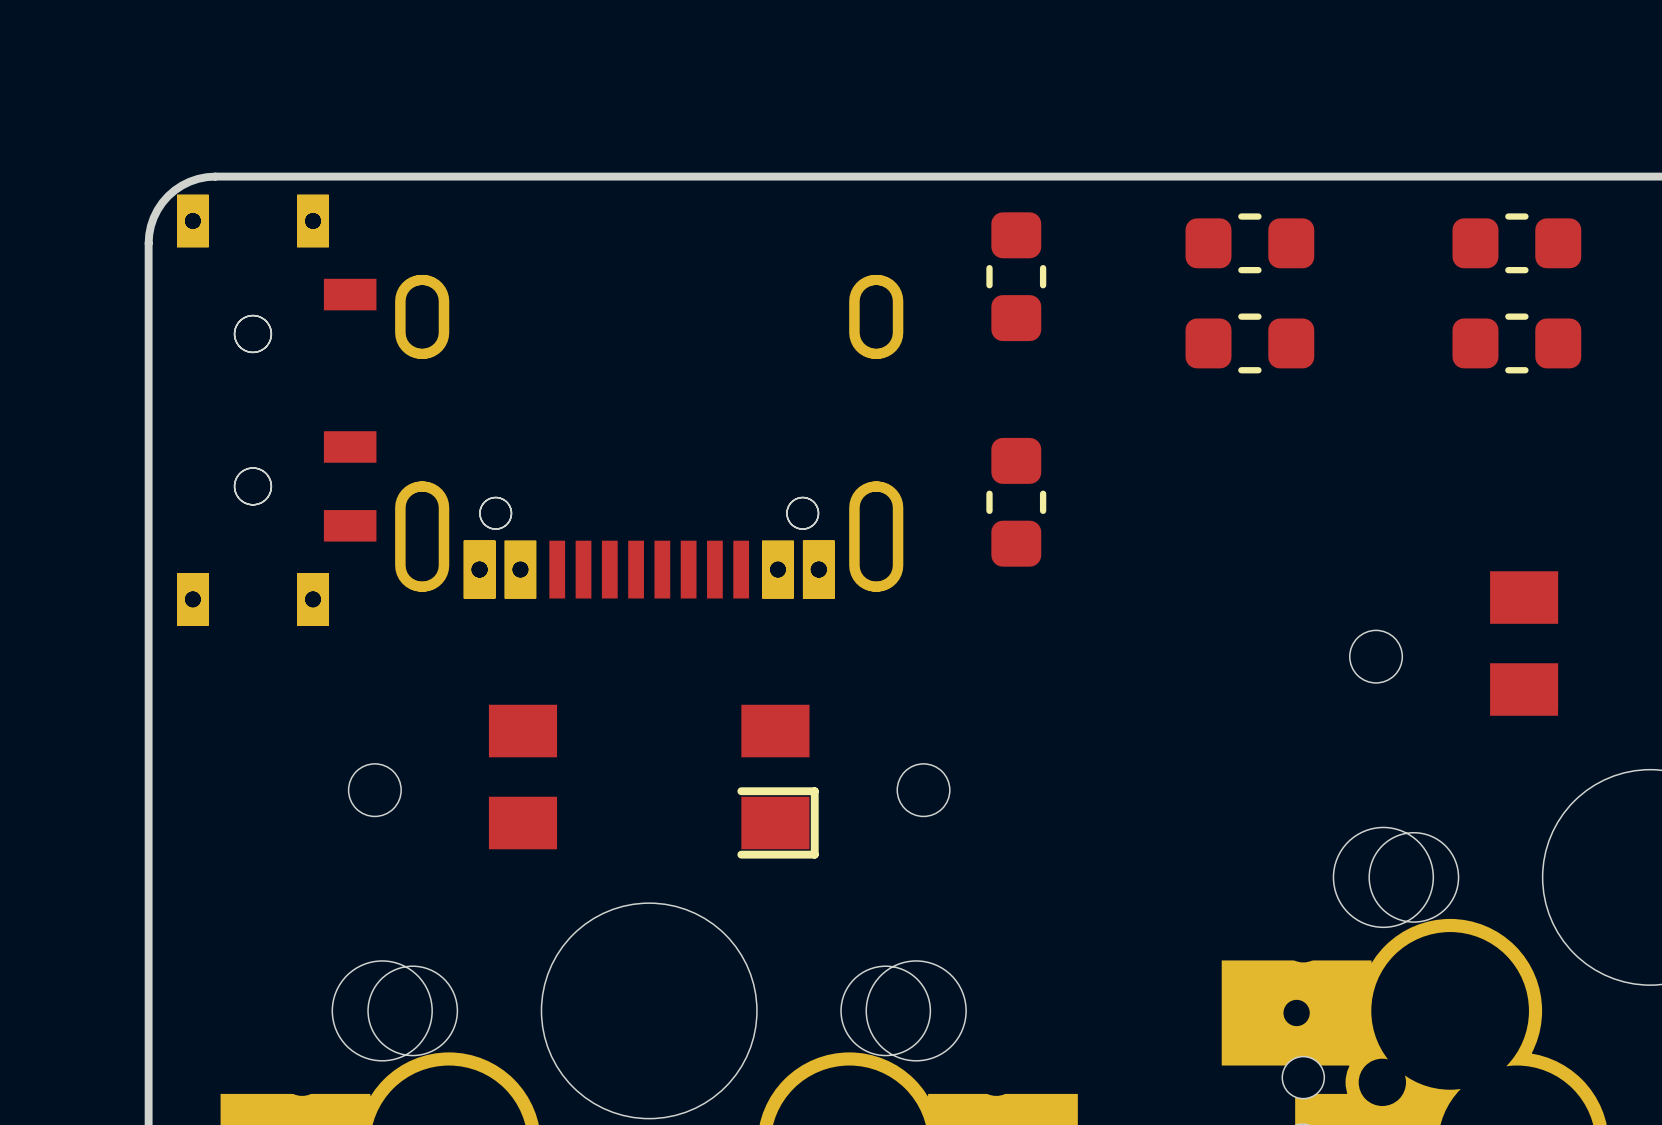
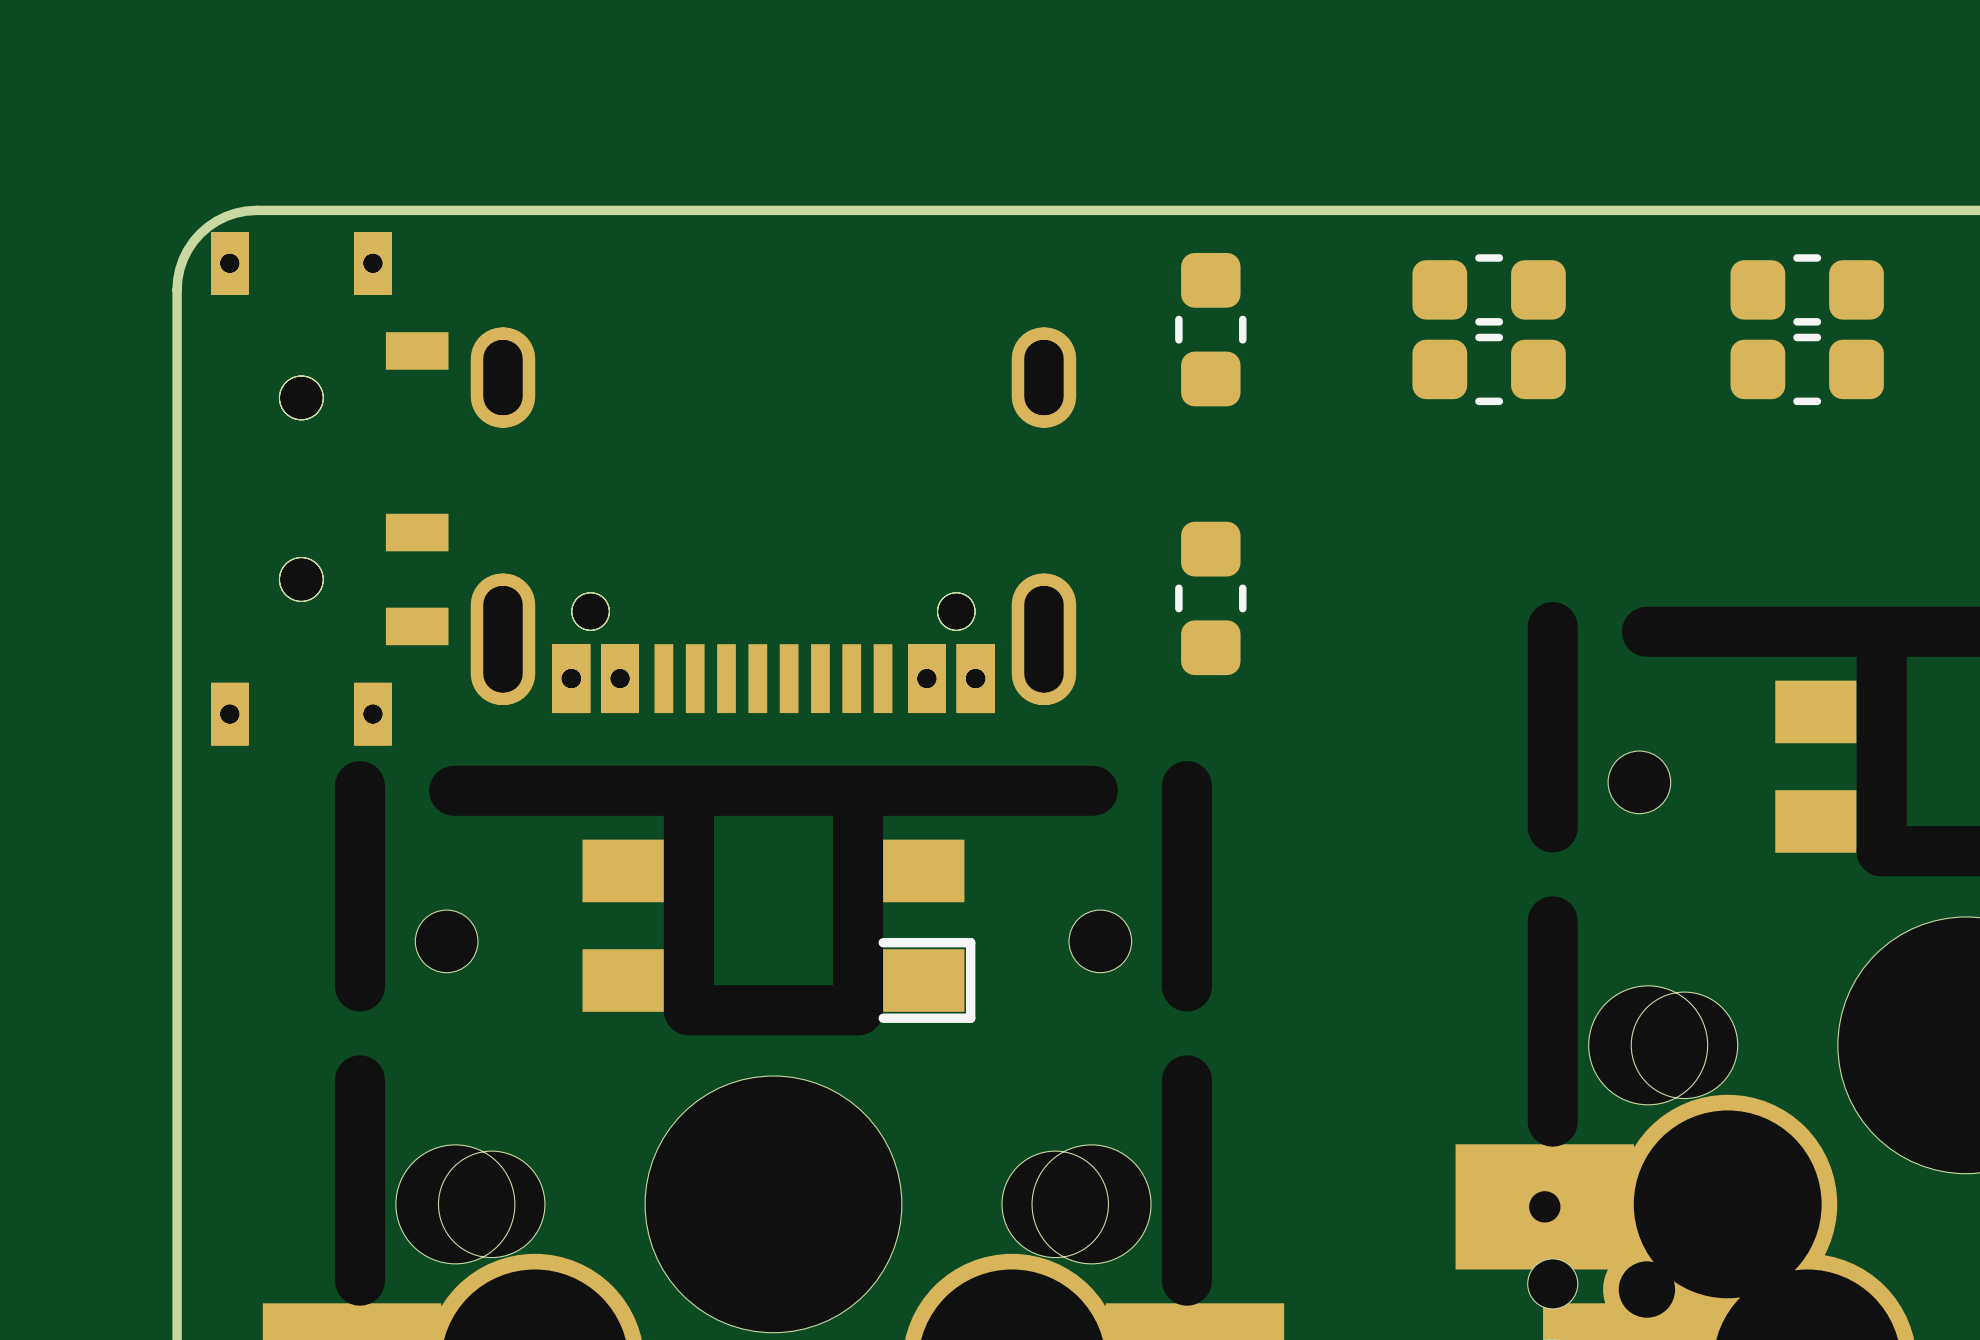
part position: (1249, 343) -> (1489, 369)
part position: (1516, 343) -> (1807, 369)

